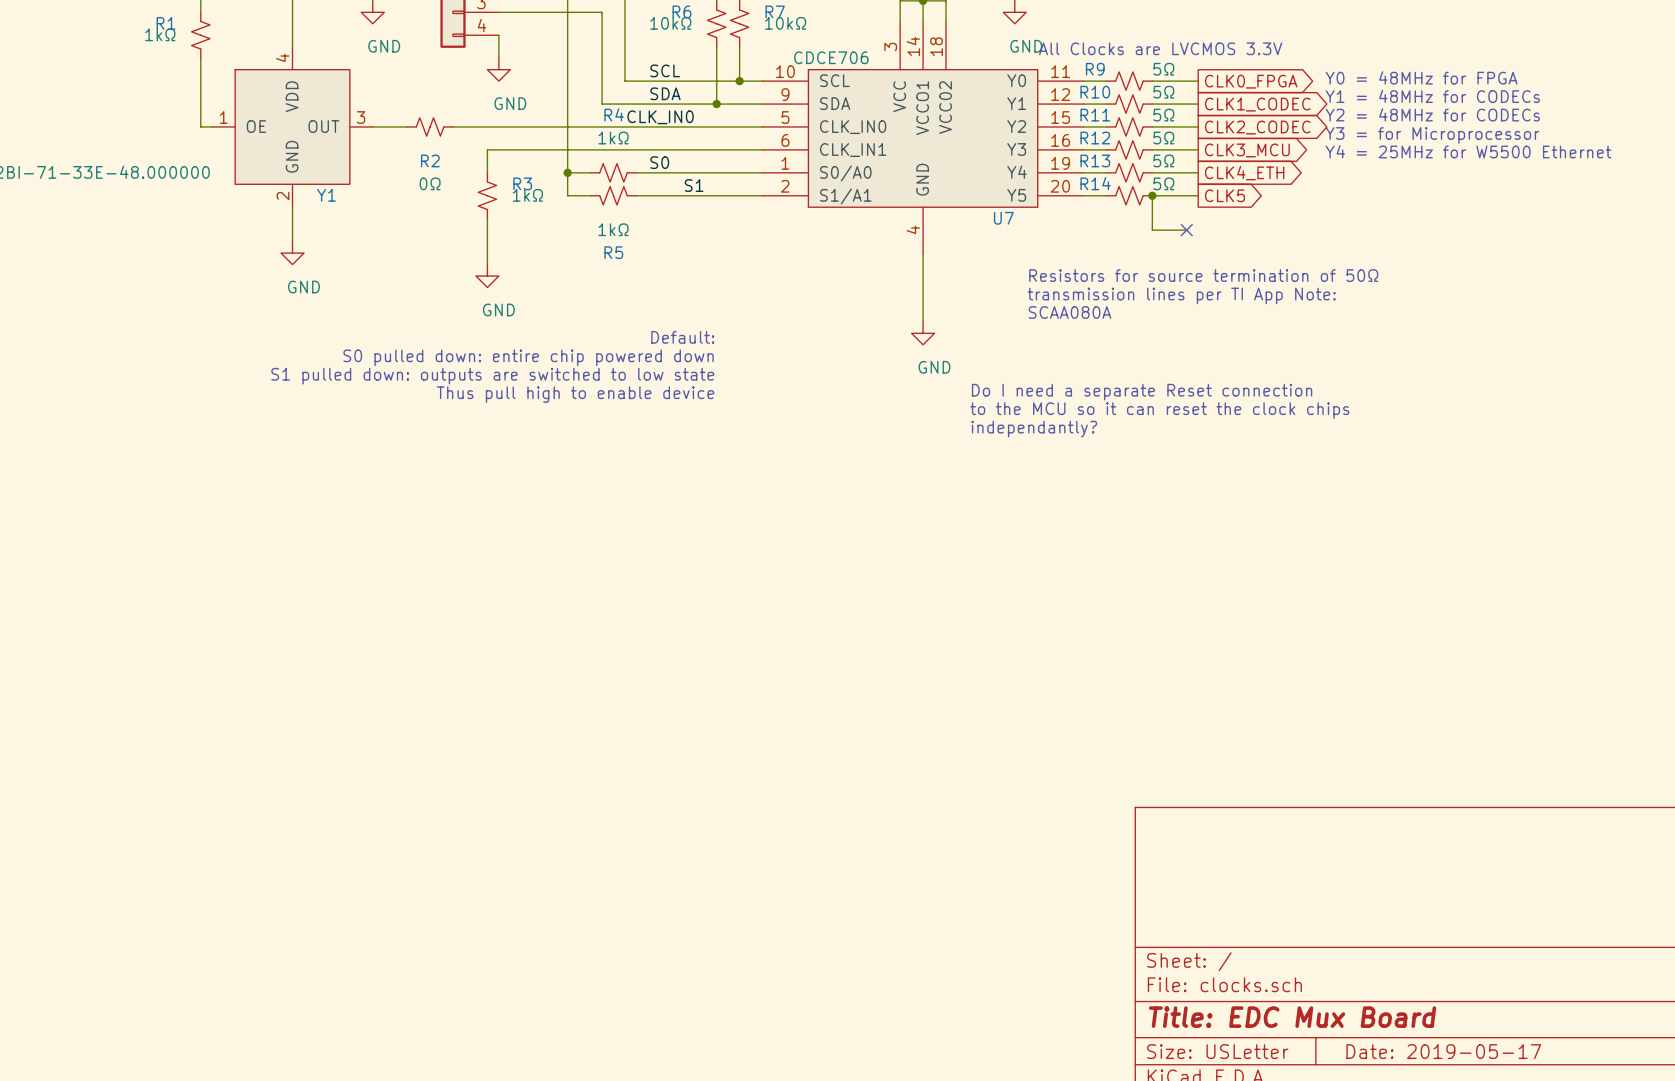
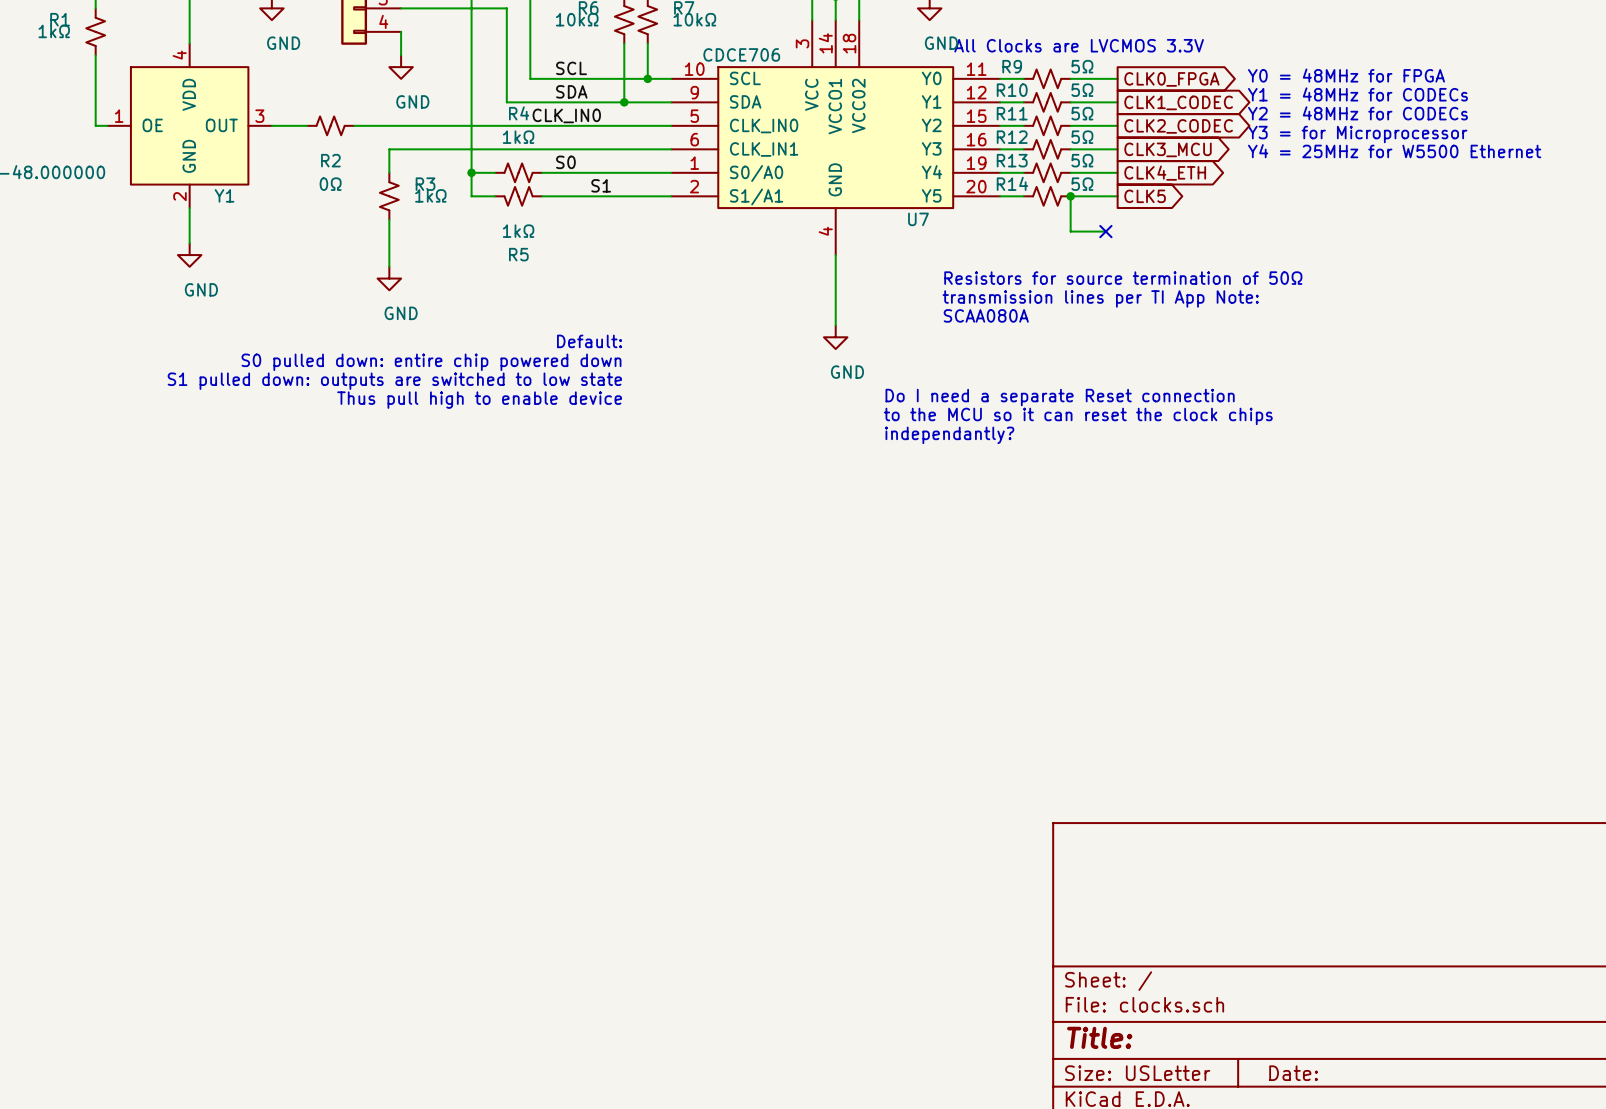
title block: Title: EDC Mux Board (1292, 1017) -> Title: (1099, 1037)
title block: Date: 2019-05-17 (1443, 1051) -> Date: (1293, 1073)

